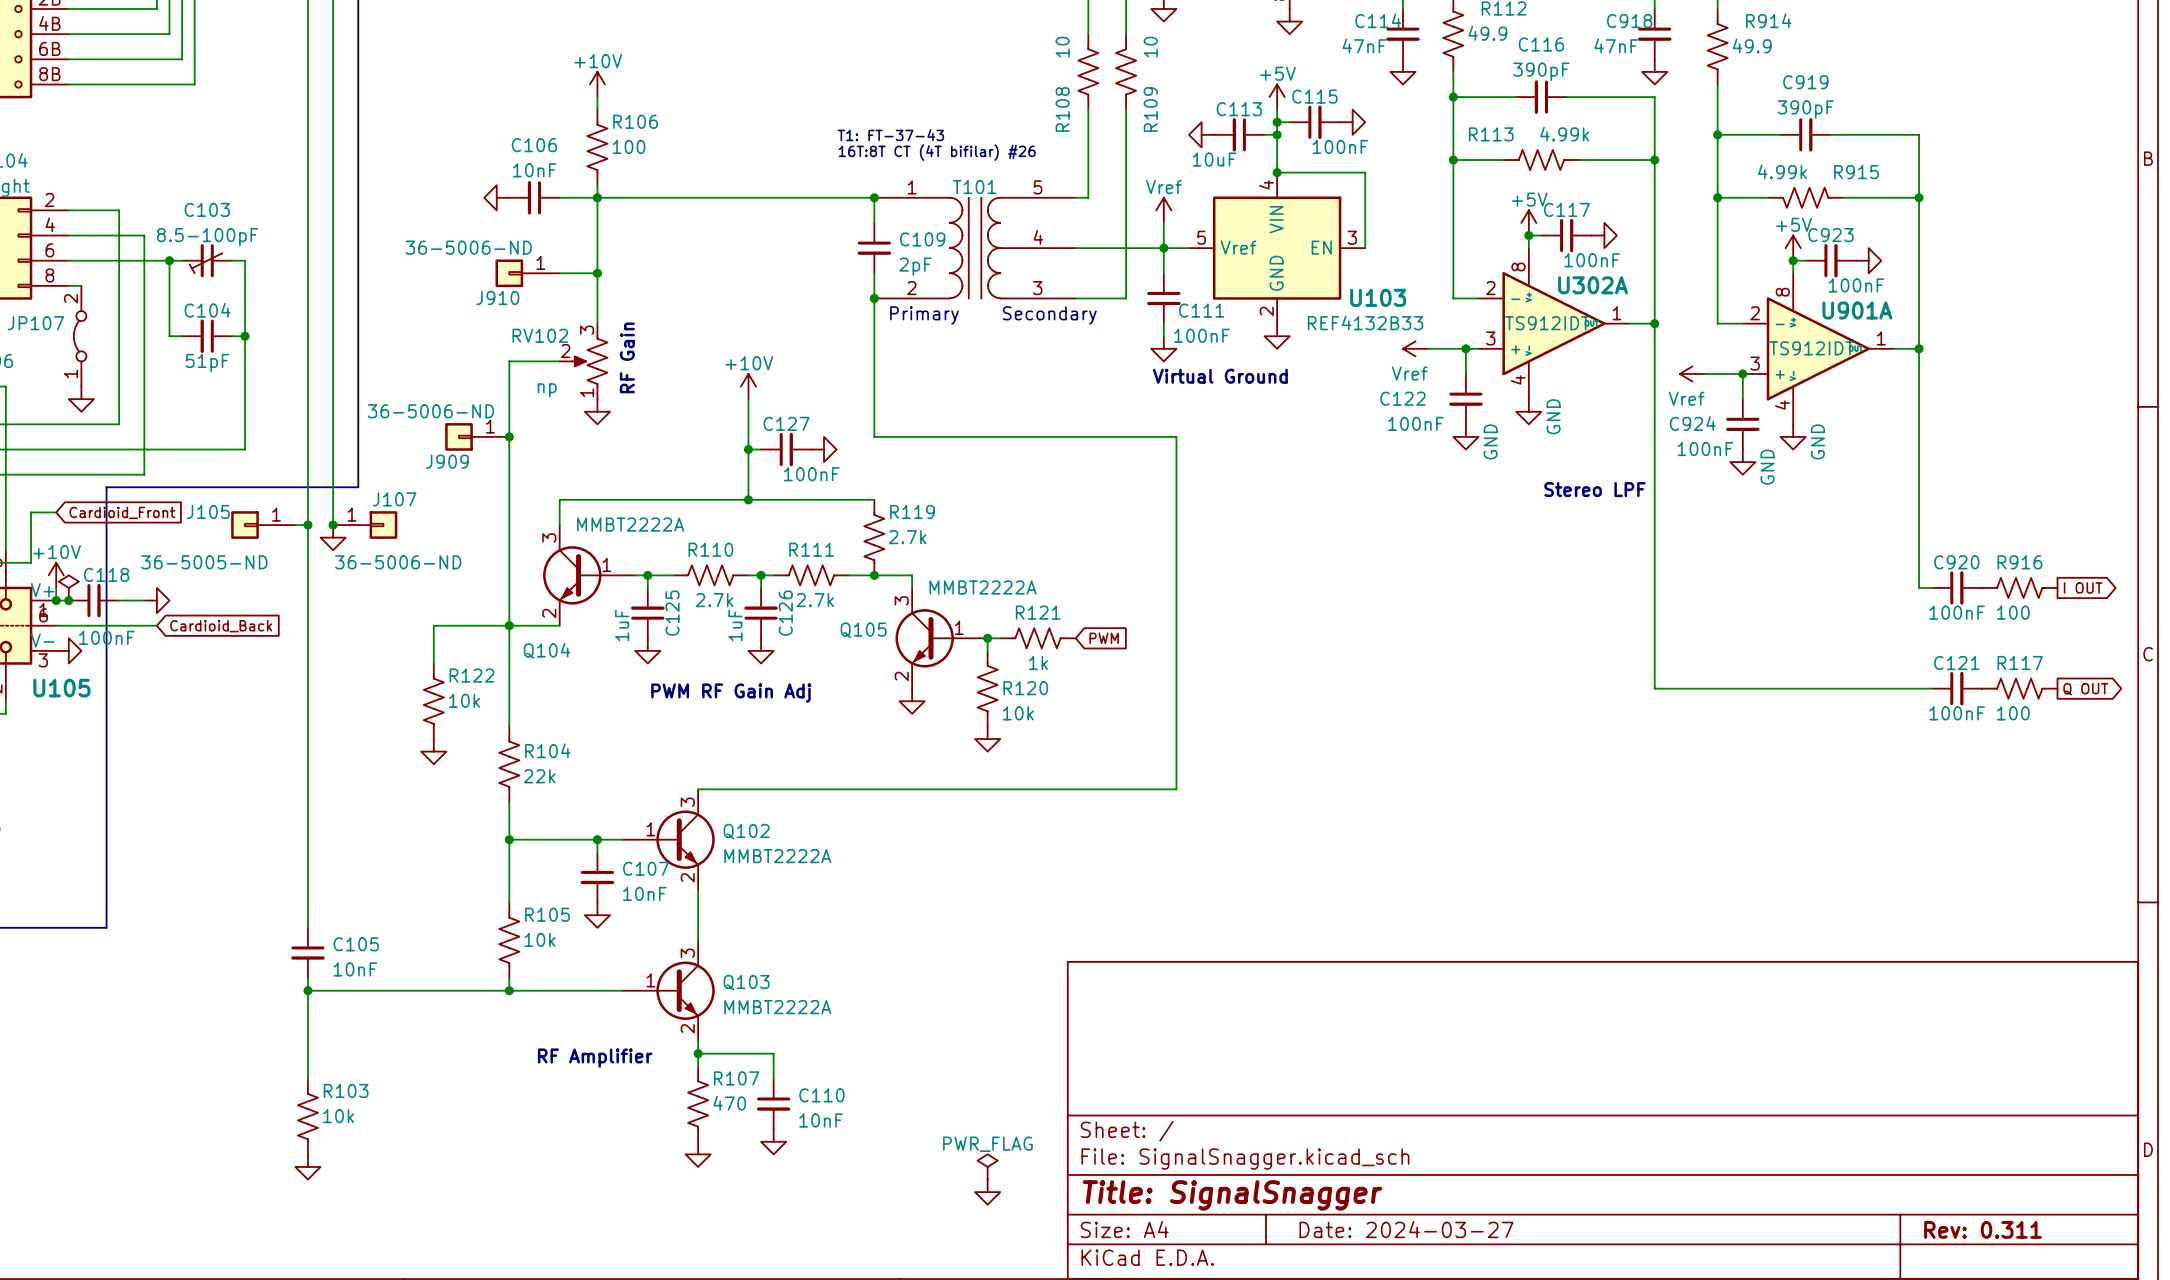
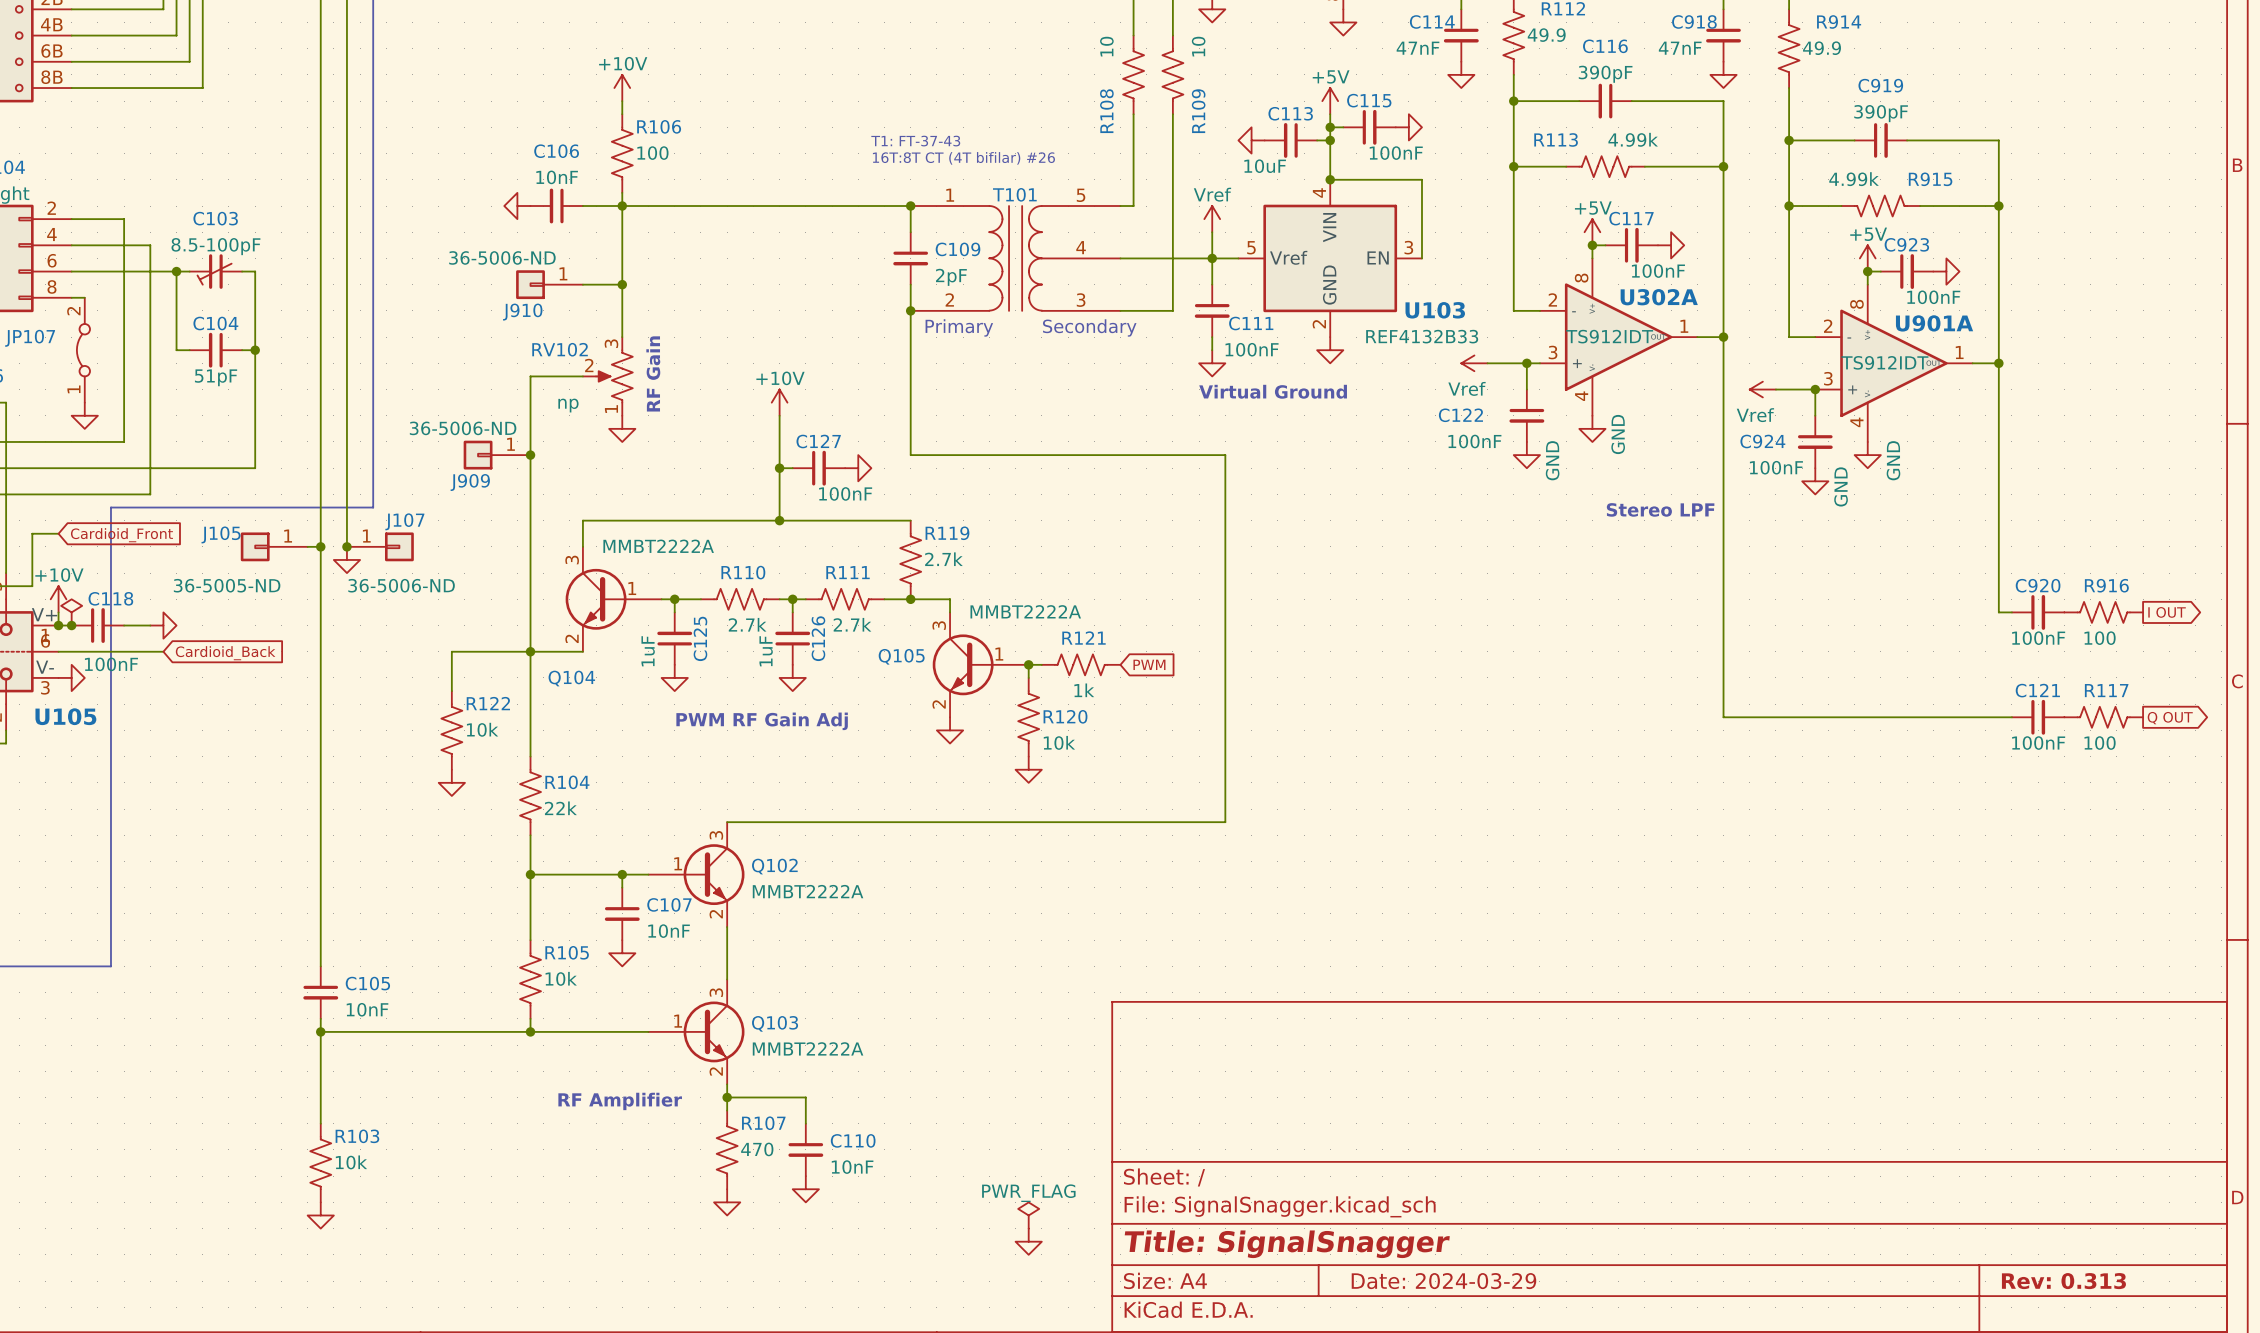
title block: Date: 2024-03-27 (1406, 1229) -> Date: 2024-03-29 (1443, 1281)
title block: Rev: 0.311 (1982, 1229) -> Rev: 0.313 (2063, 1281)

